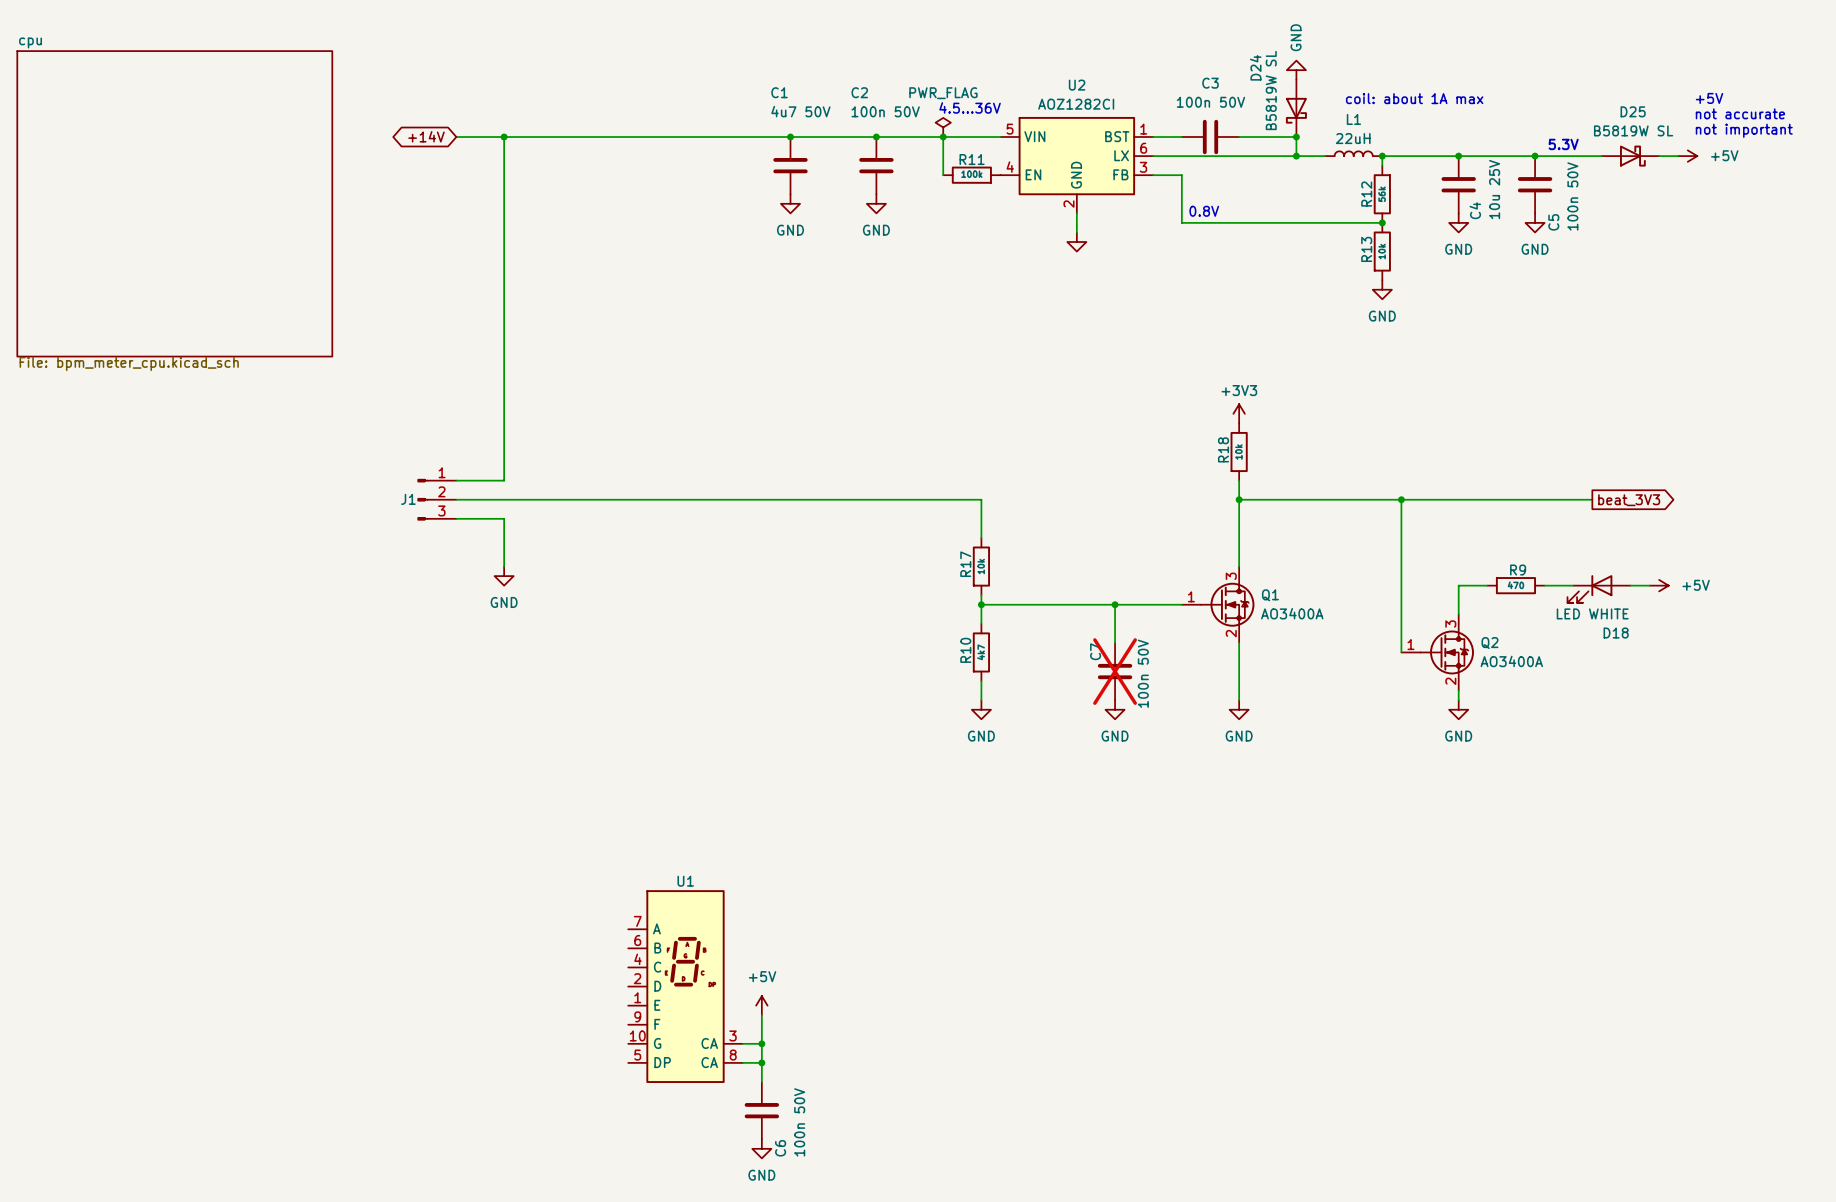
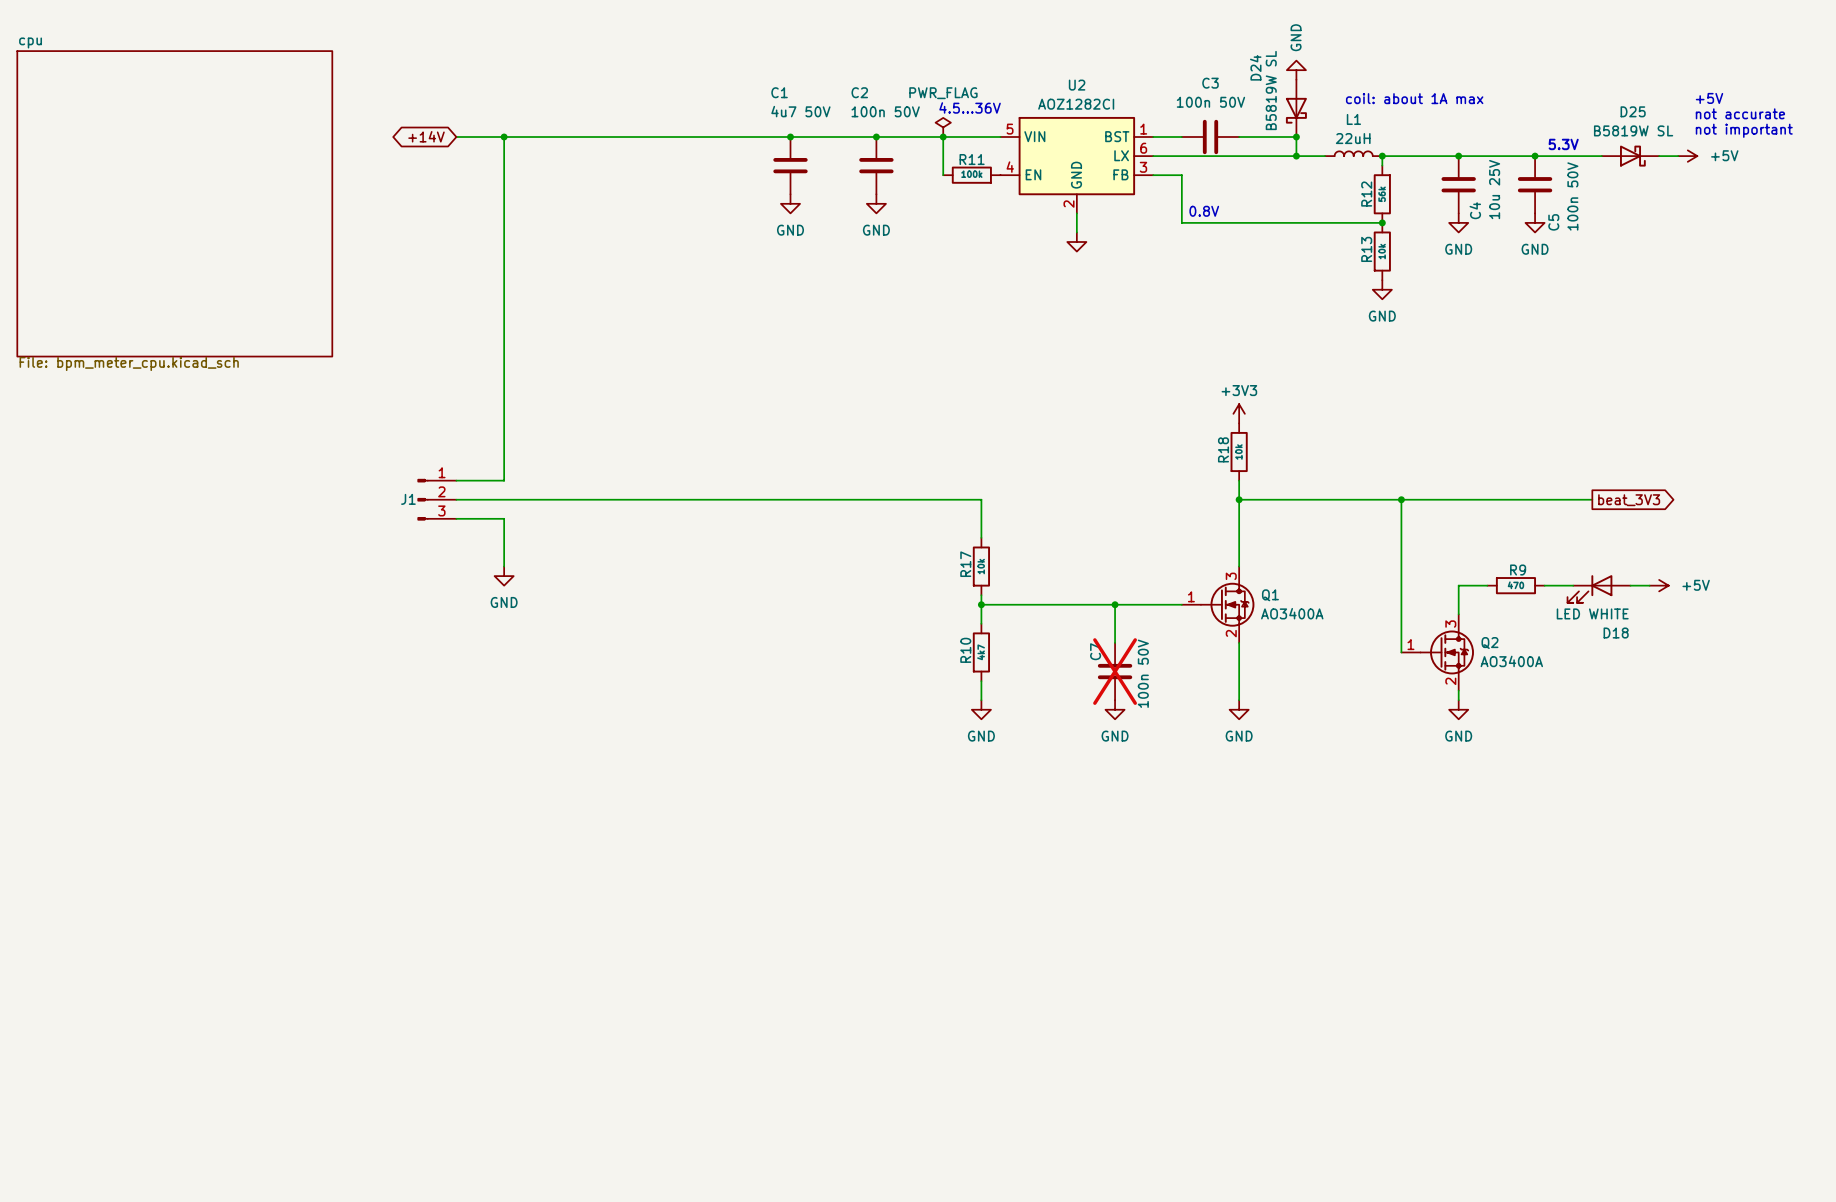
U1: (685, 986) -> none
power symbol: +5V (761, 1005) -> none
wire: (761, 1015) (761, 1082) -> none
wire: (742, 1043) (761, 1043) -> none
junction: (761, 1043) -> none
wire: (742, 1062) (761, 1062) -> none
junction: (761, 1062) -> none
C6: 100n 50V (761, 1110) -> none
power symbol: GND (761, 1148) -> none

